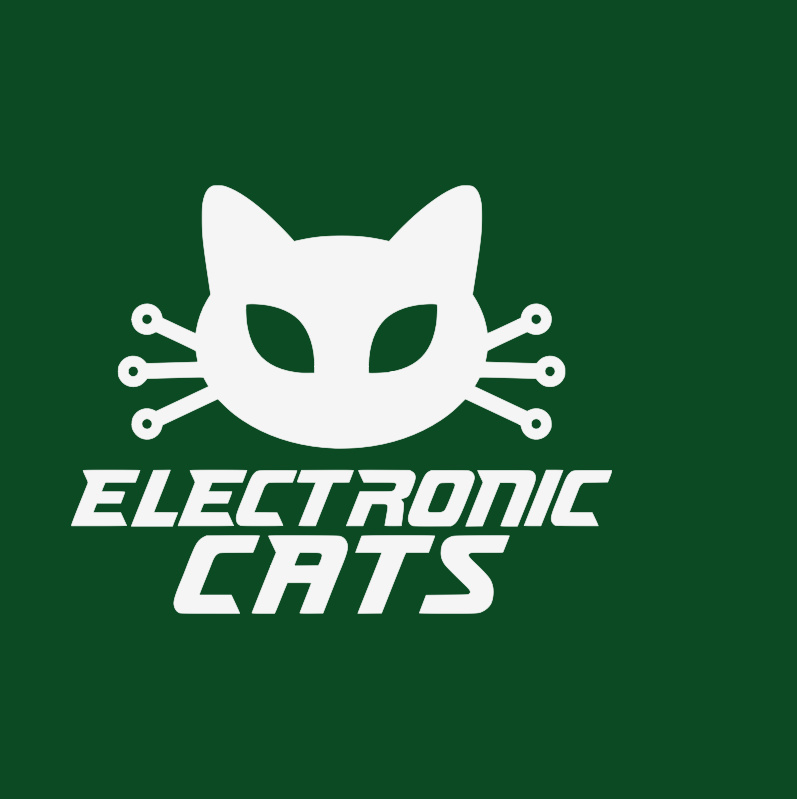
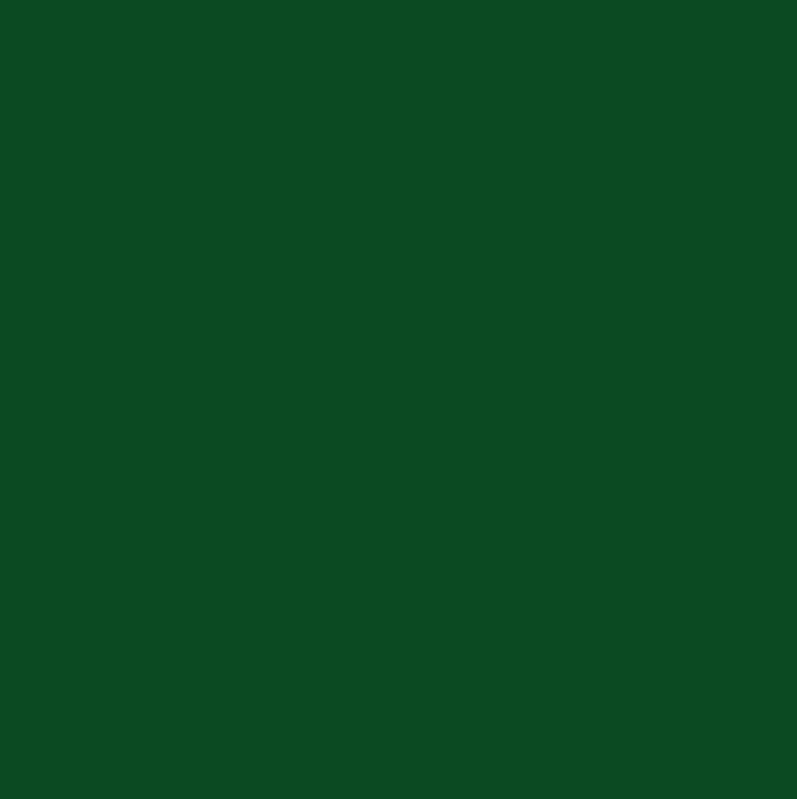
drawing: [71, 185, 612, 614] -> none

